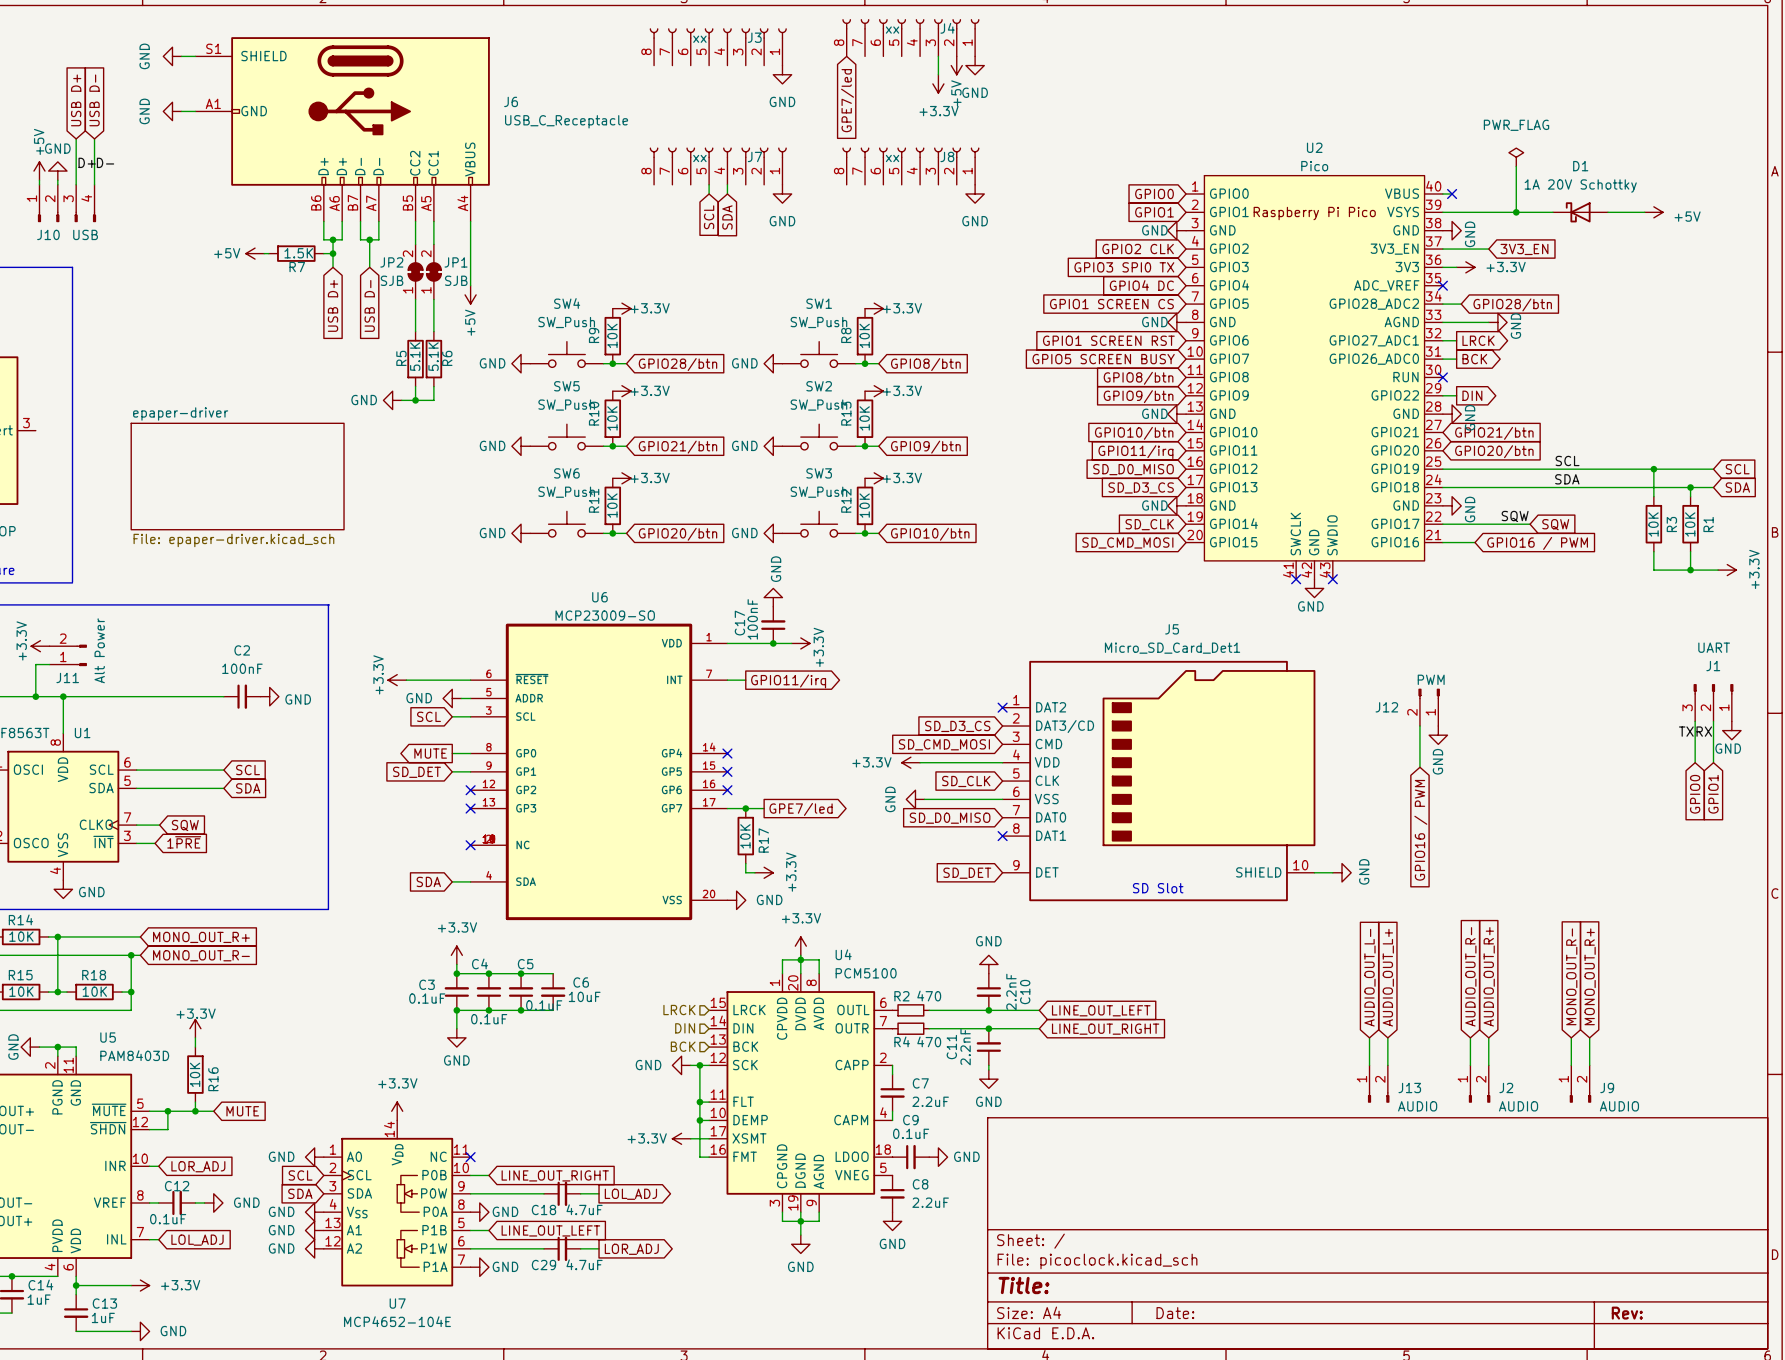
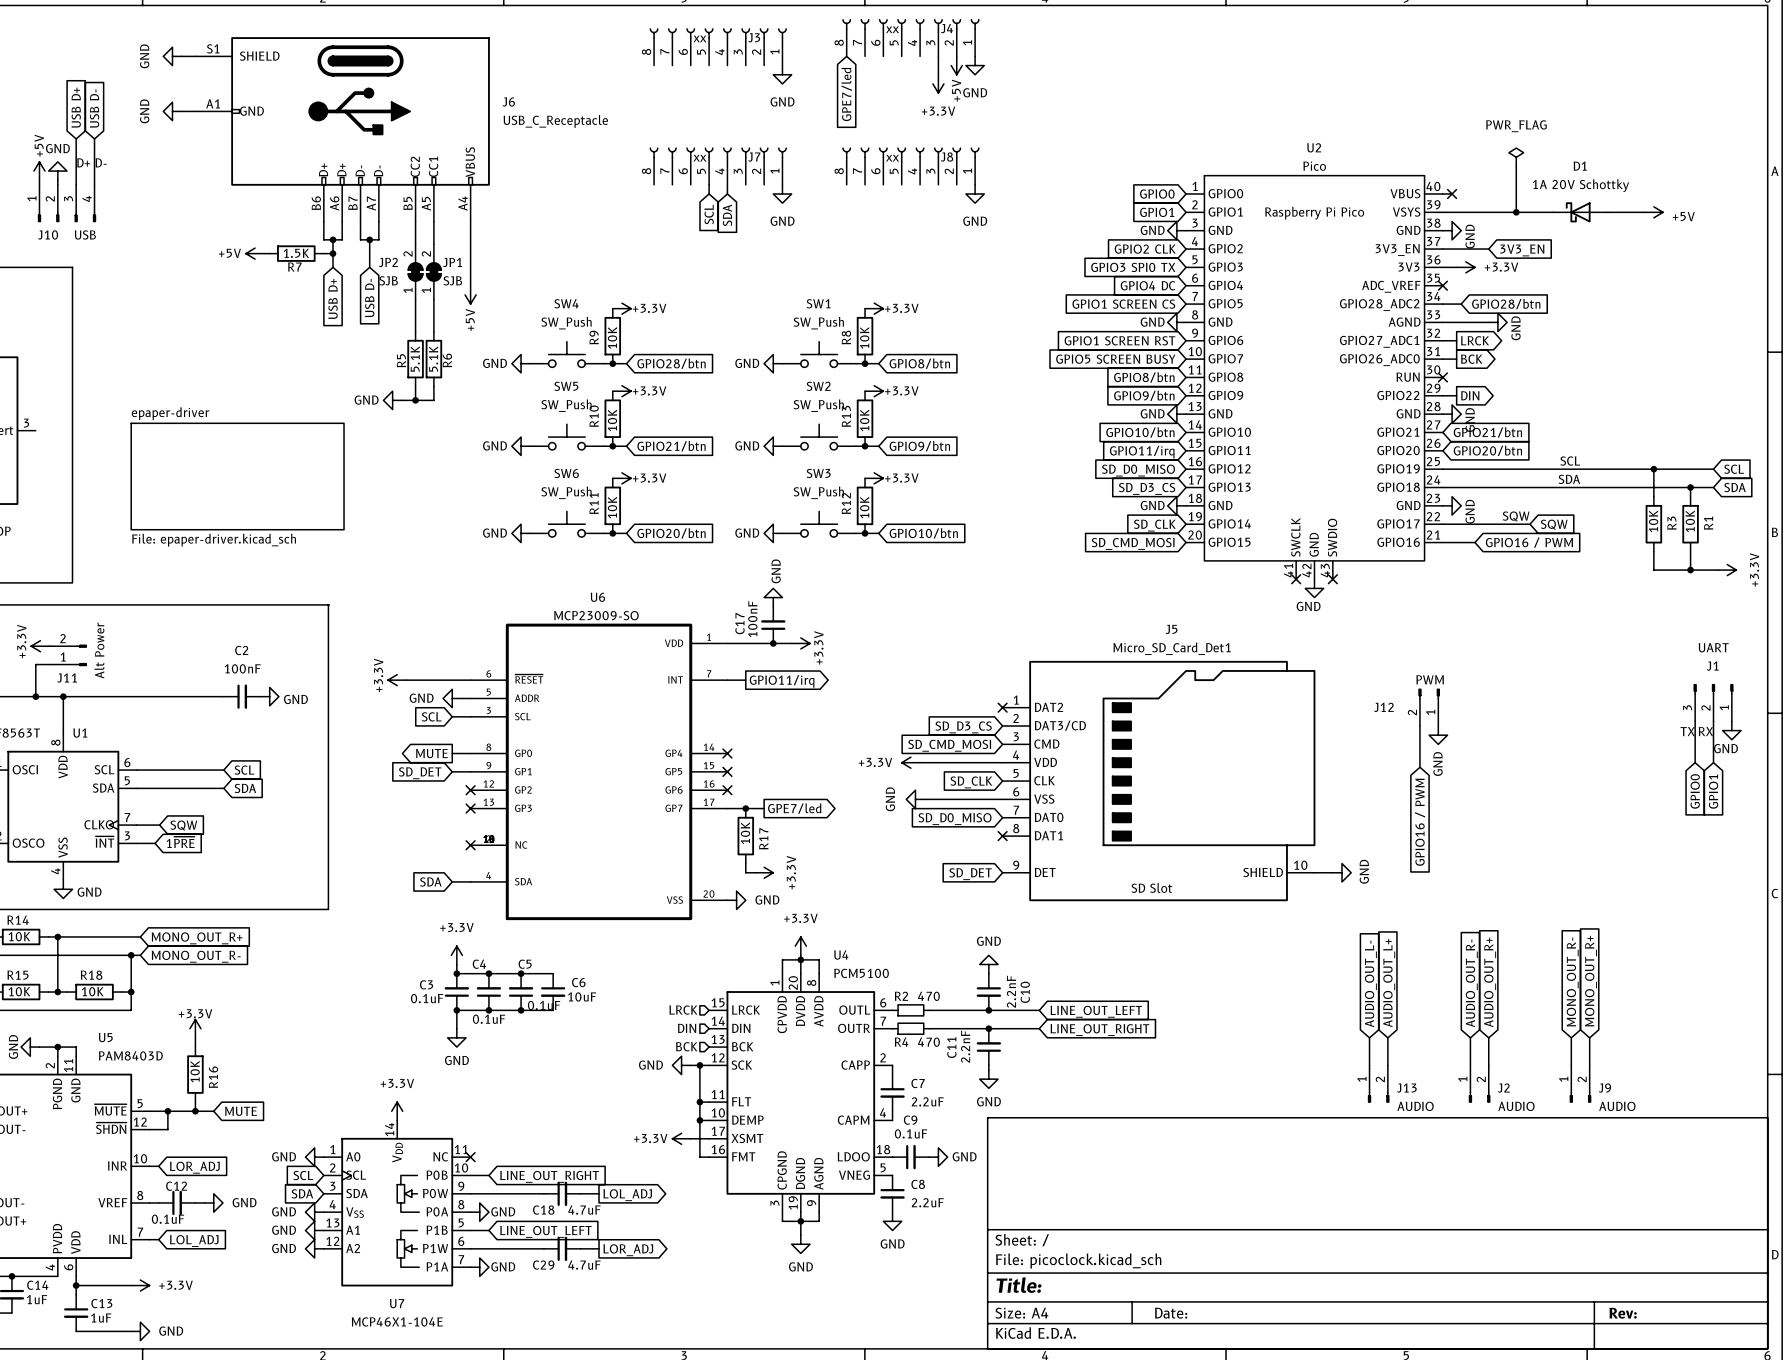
U7 value: MCP4652-104E (397, 1321) -> MCP46X1-104E (397, 1321)

